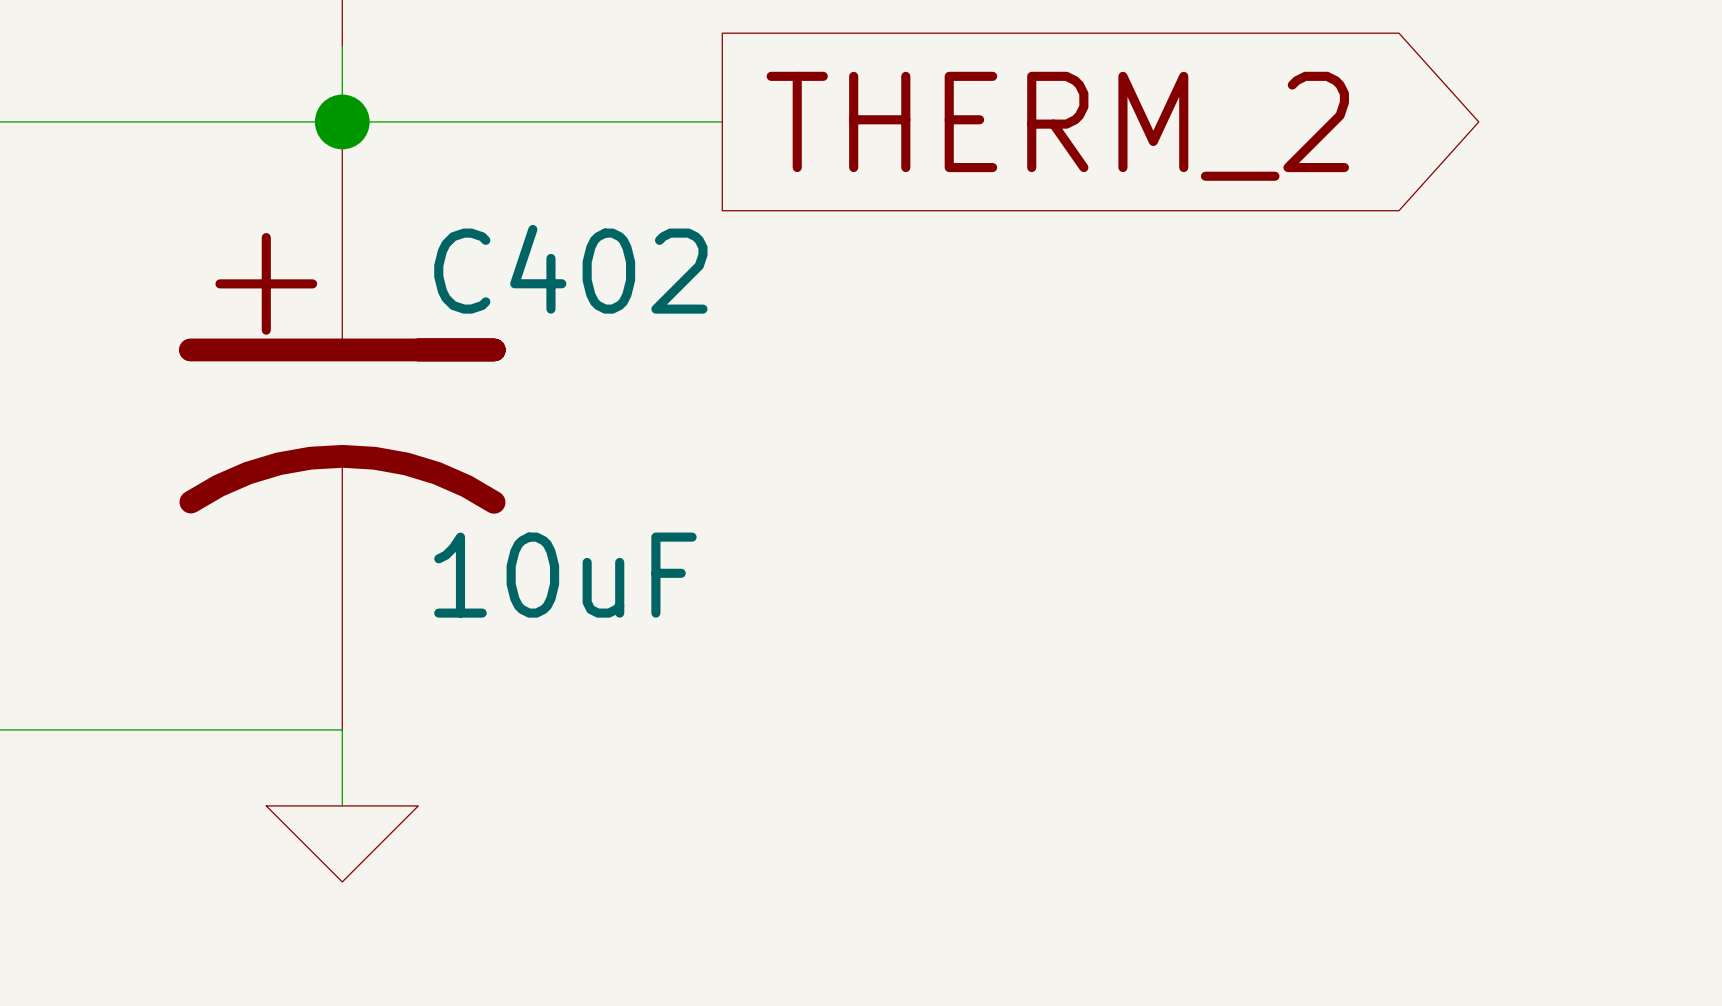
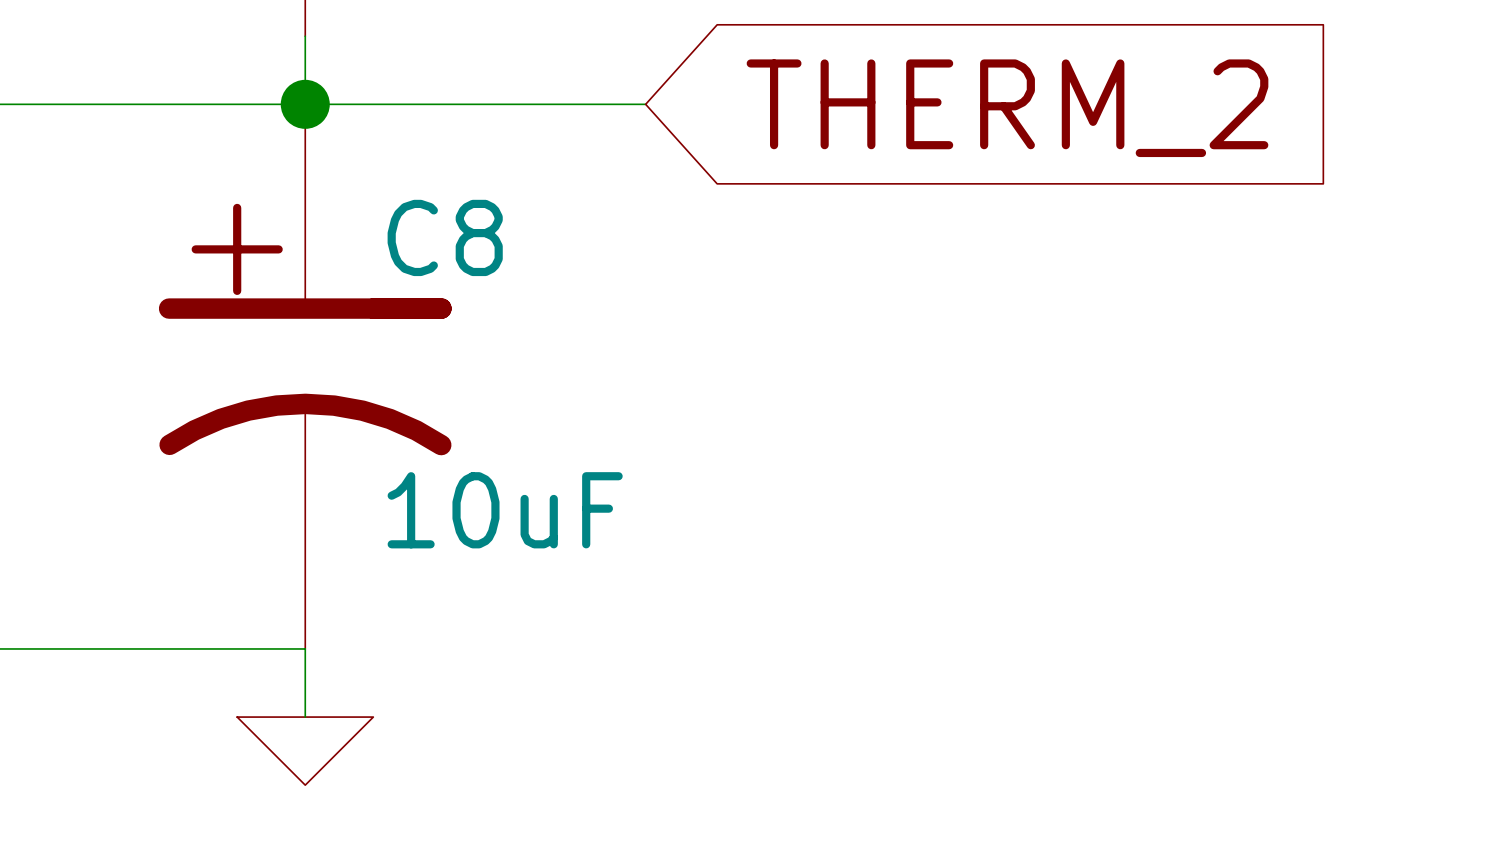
global label shape: output (1057, 126) -> input (1007, 108)
C402 name: C402 (570, 269) -> C8 (445, 237)

